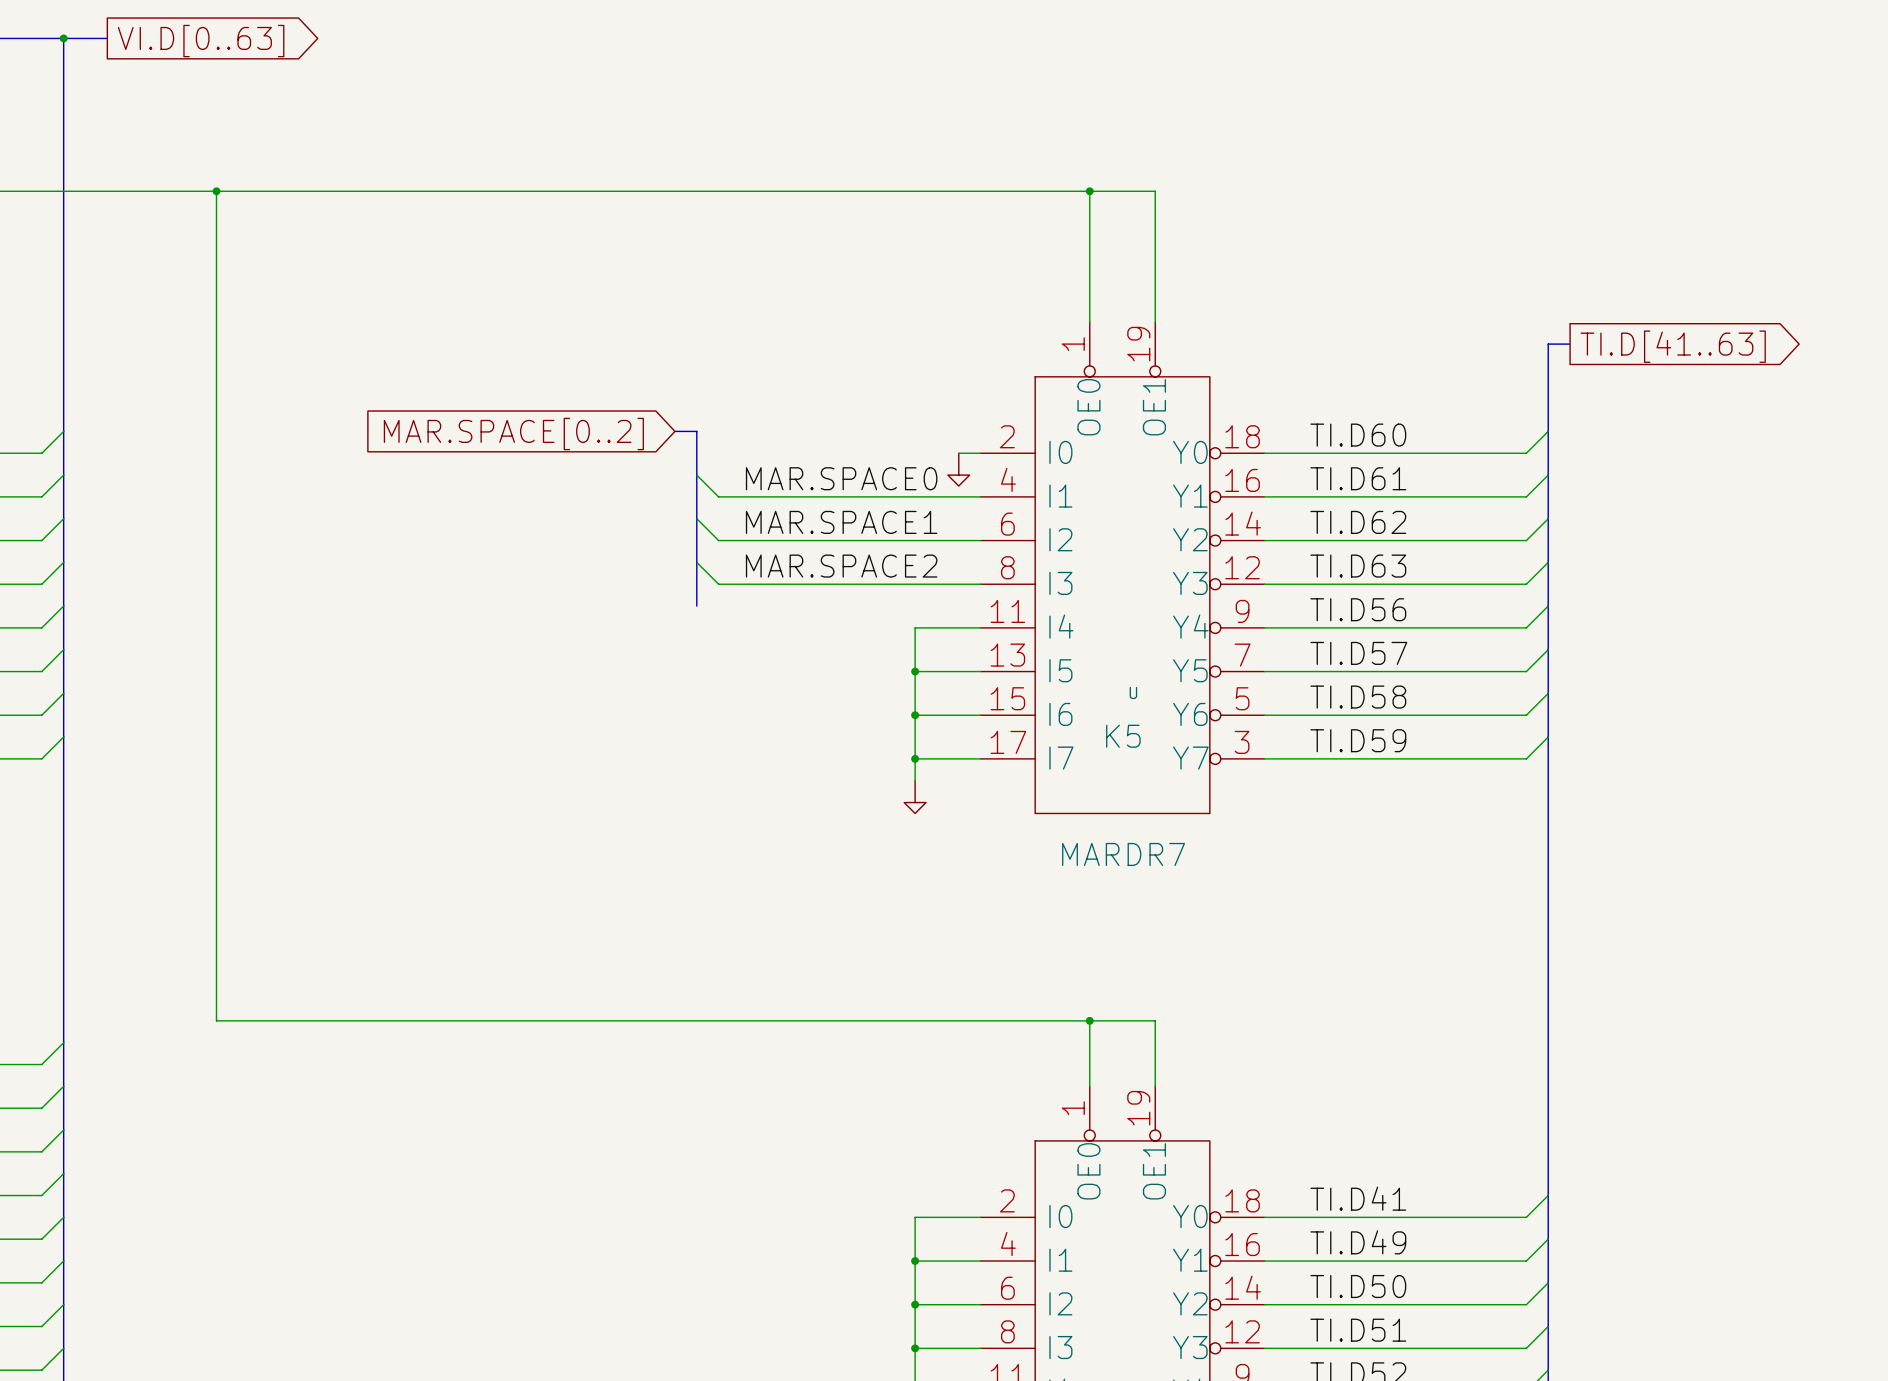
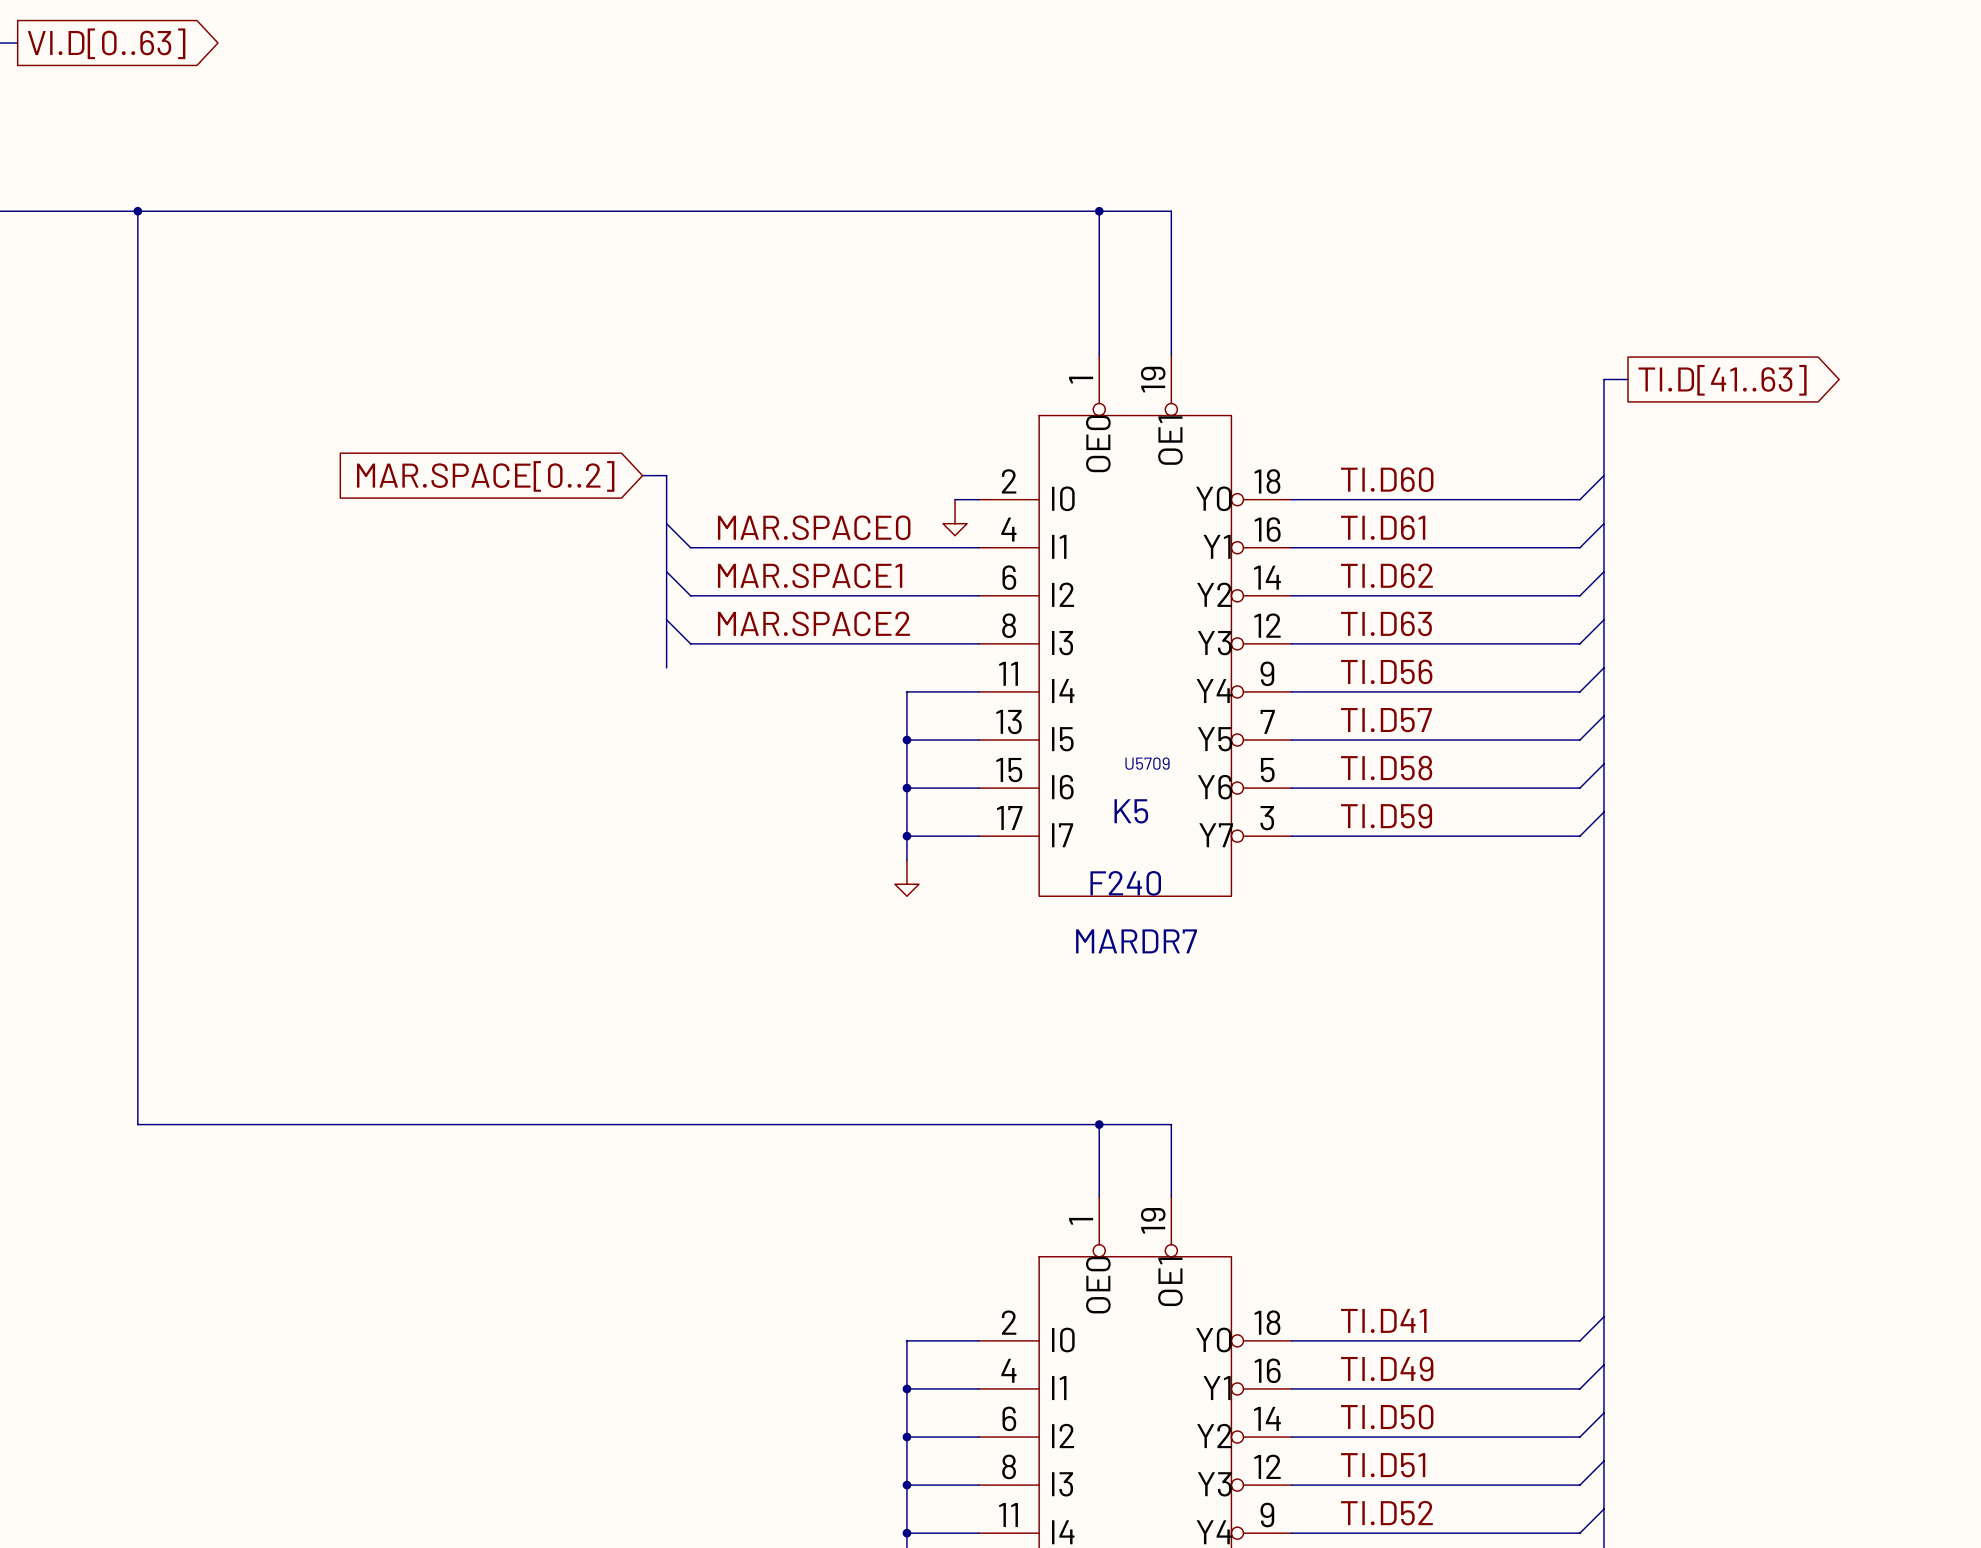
U name: U (1133, 692) -> U5709 (1147, 763)
U value: none -> F240 (1125, 883)

